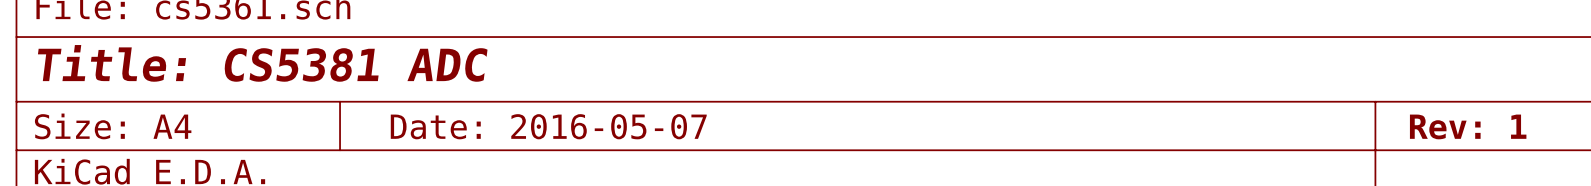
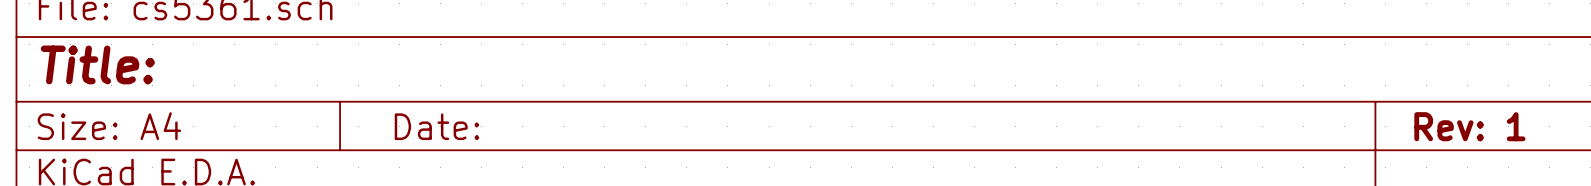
title block: Title: CS5381 ADC (262, 63) -> Title: (97, 64)
title block: Date: 2016-05-07 (548, 126) -> Date: (436, 126)

